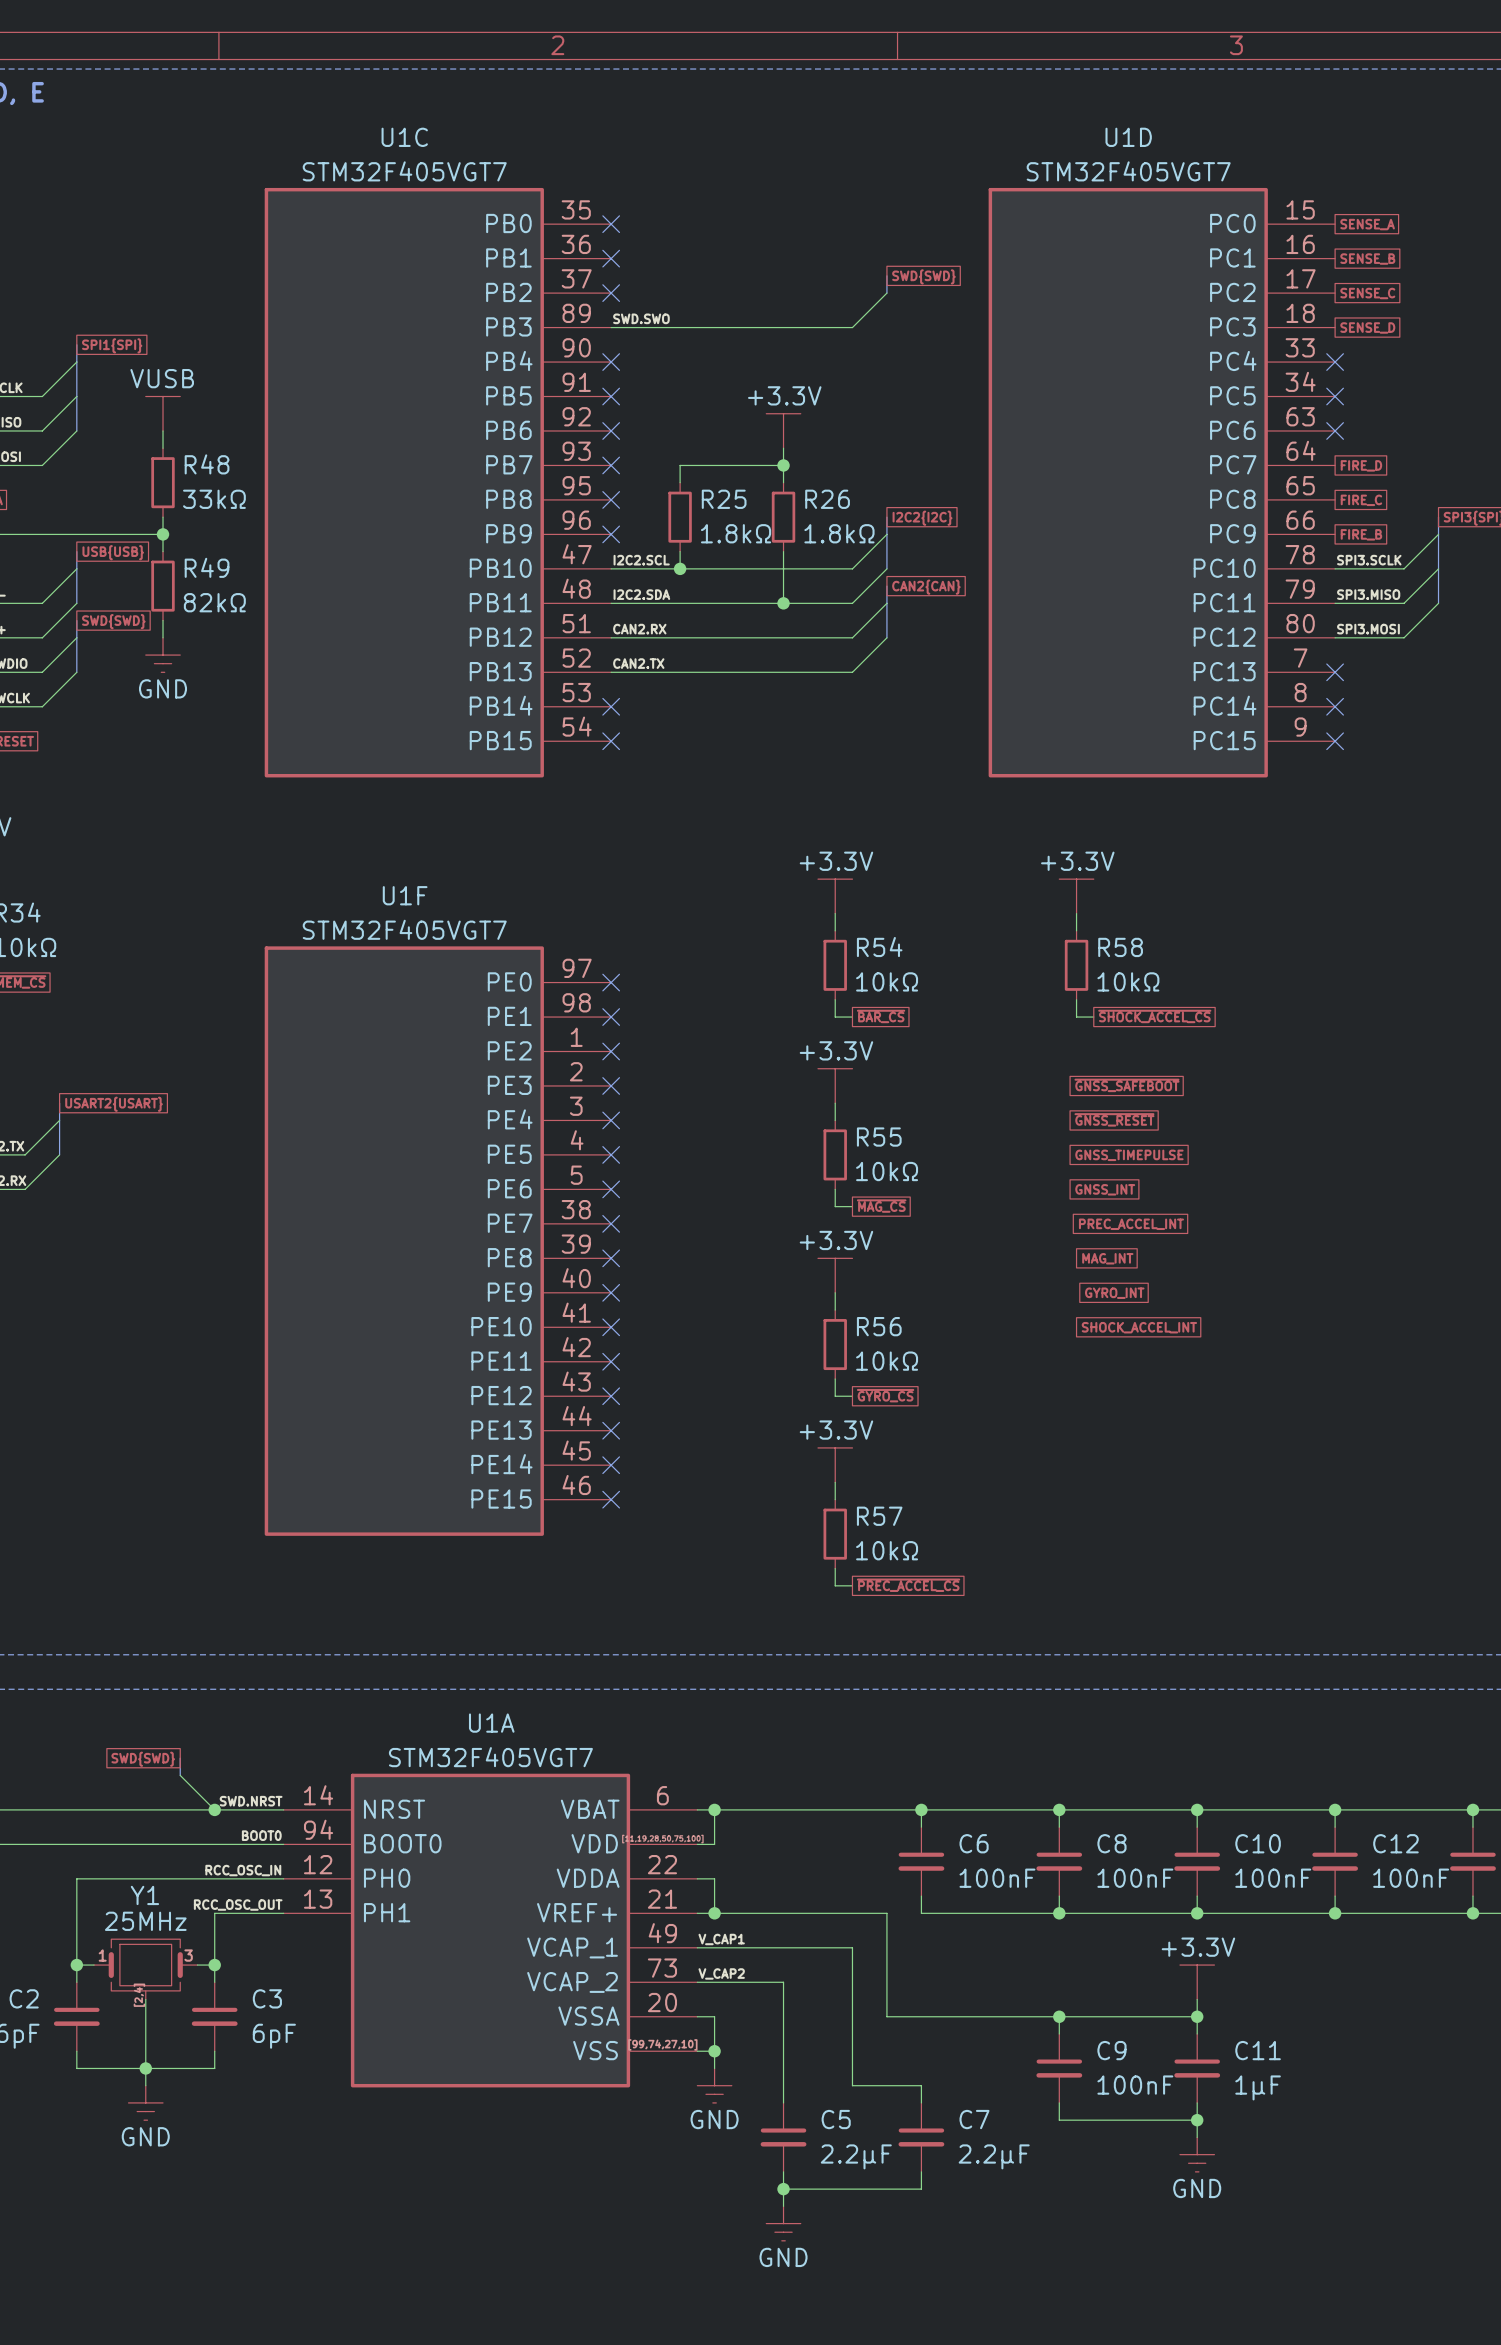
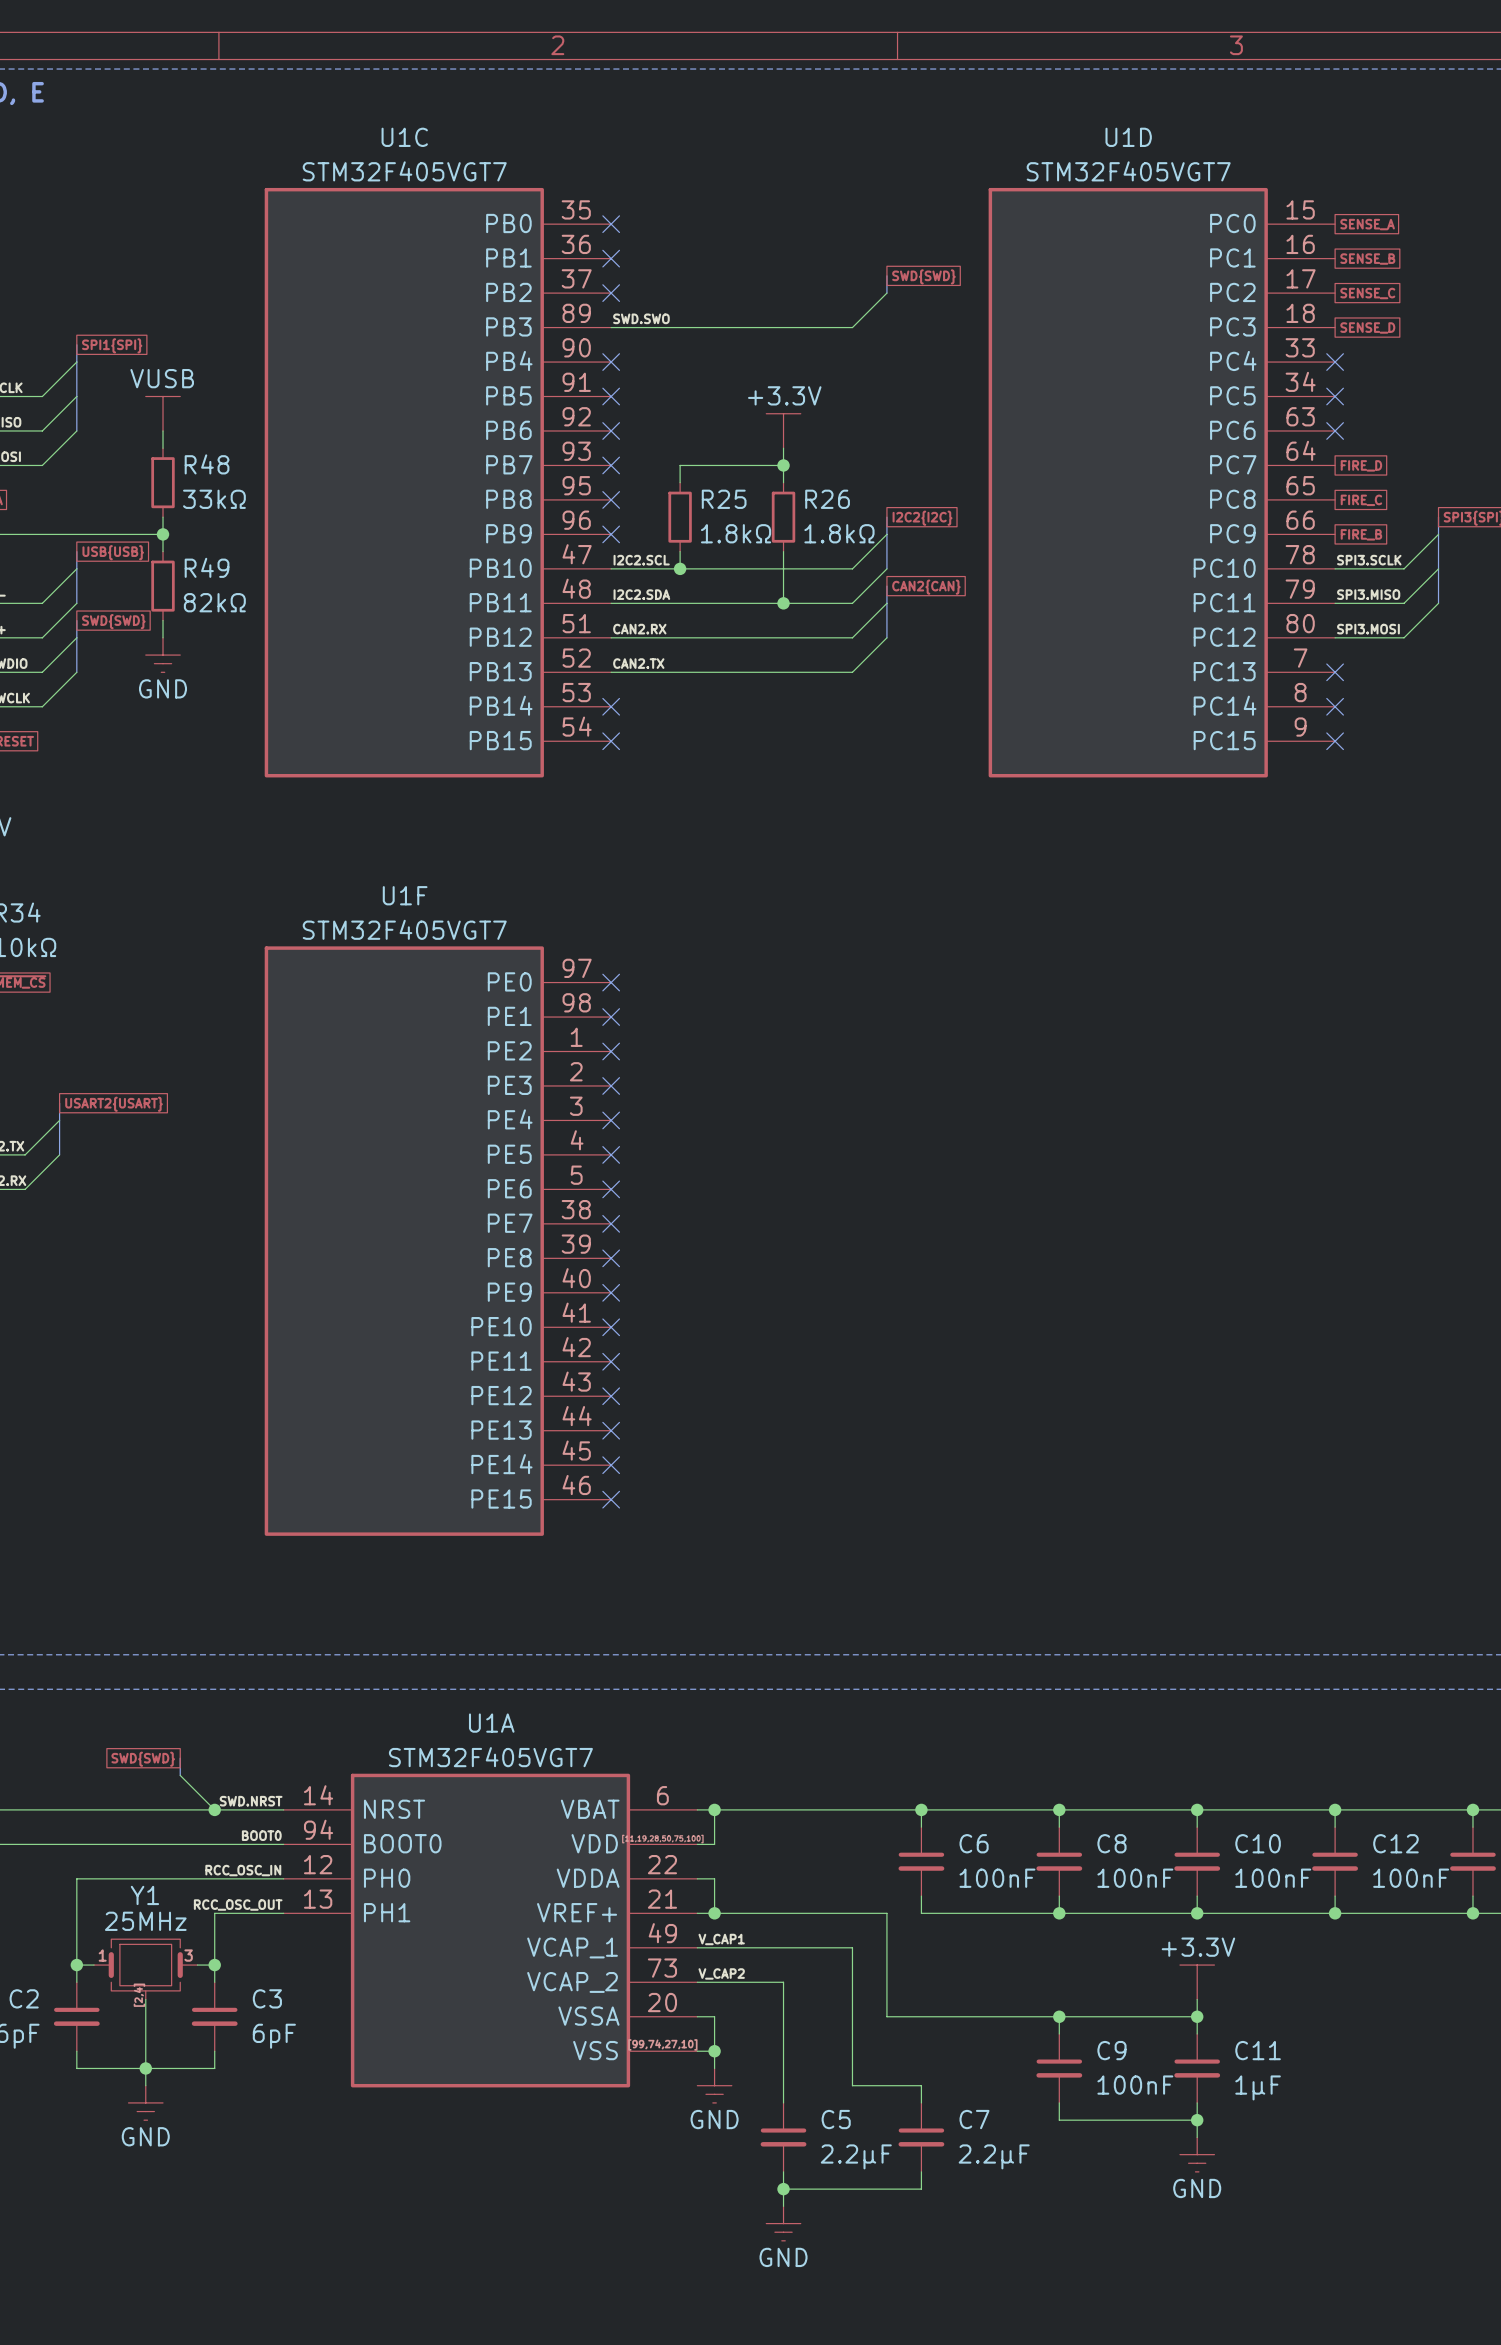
power symbol: +3.3V (835, 896) -> none
power symbol: +3.3V (1076, 896) -> none
wire: (835, 913) (835, 930) -> none
wire: (1076, 913) (1076, 930) -> none
R54: 10kΩ (835, 965) -> none
R58: 10kΩ (1076, 965) -> none
wire: (835, 999) (835, 1017) (852, 1017) -> none
wire: (1076, 999) (1076, 1017) (1093, 1017) -> none
global label: ~{BAR_CS} (881, 1016) -> none
global label: ~{SHOCK_ACCEL_CS} (1154, 1016) -> none
power symbol: +3.3V (835, 1085) -> none
global label: ~{GNSS_SAFEBOOT} (1127, 1085) -> none
wire: (835, 1103) (835, 1120) -> none
global label: ~{GNSS_RESET} (1114, 1119) -> none
R55: 10kΩ (835, 1154) -> none
global label: GNSS_TIMEPULSE (1129, 1155) -> none
wire: (835, 1189) (835, 1206) (852, 1206) -> none
global label: GNSS_INT (1105, 1189) -> none
global label: ~{MAG_CS} (881, 1206) -> none
global label: PREC_ACCEL_INT (1131, 1224) -> none
global label: MAG_INT (1107, 1258) -> none
power symbol: +3.3V (835, 1275) -> none
wire: (835, 1292) (835, 1310) -> none
global label: GYRO_INT (1114, 1293) -> none
global label: SHOCK_ACCEL_INT (1139, 1327) -> none
R56: 10kΩ (835, 1344) -> none
wire: (835, 1379) (835, 1396) (852, 1396) -> none
global label: ~{GYRO_CS} (885, 1395) -> none
power symbol: +3.3V (835, 1465) -> none
wire: (835, 1482) (835, 1499) -> none
R57: 10kΩ (835, 1534) -> none
wire: (835, 1568) (835, 1585) (852, 1585) -> none
global label: ~{PREC_ACCEL_CS} (908, 1585) -> none

